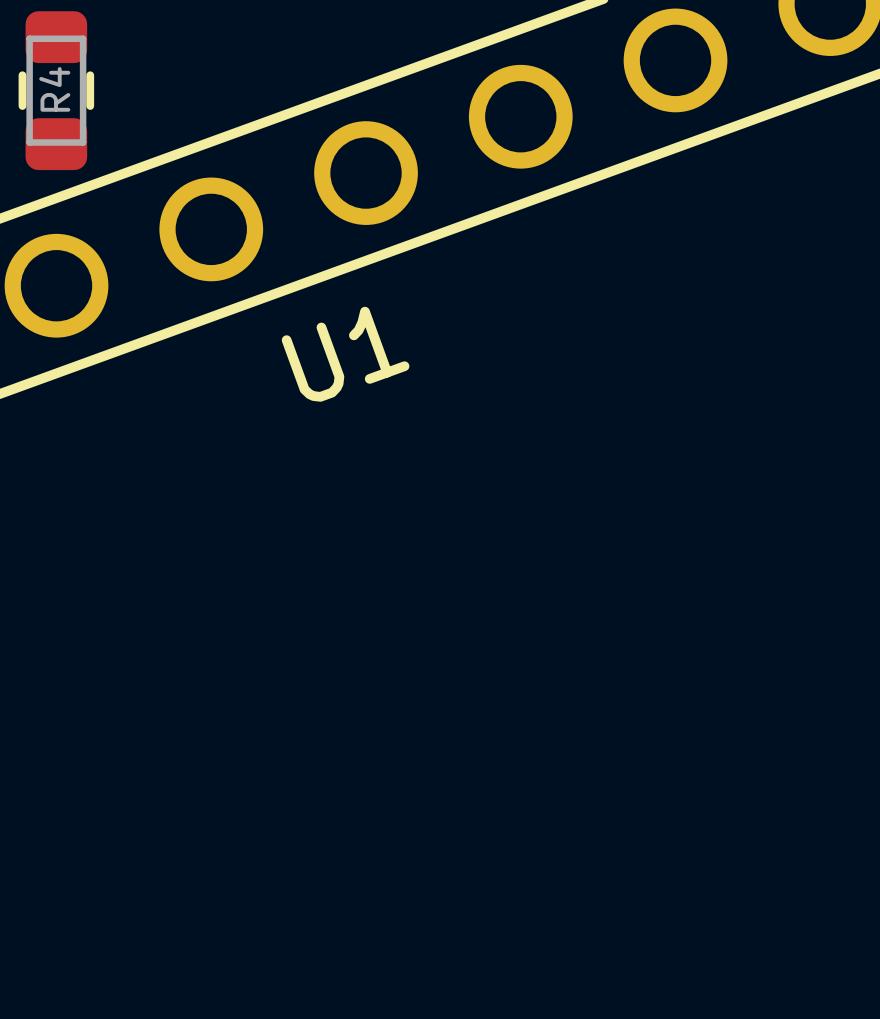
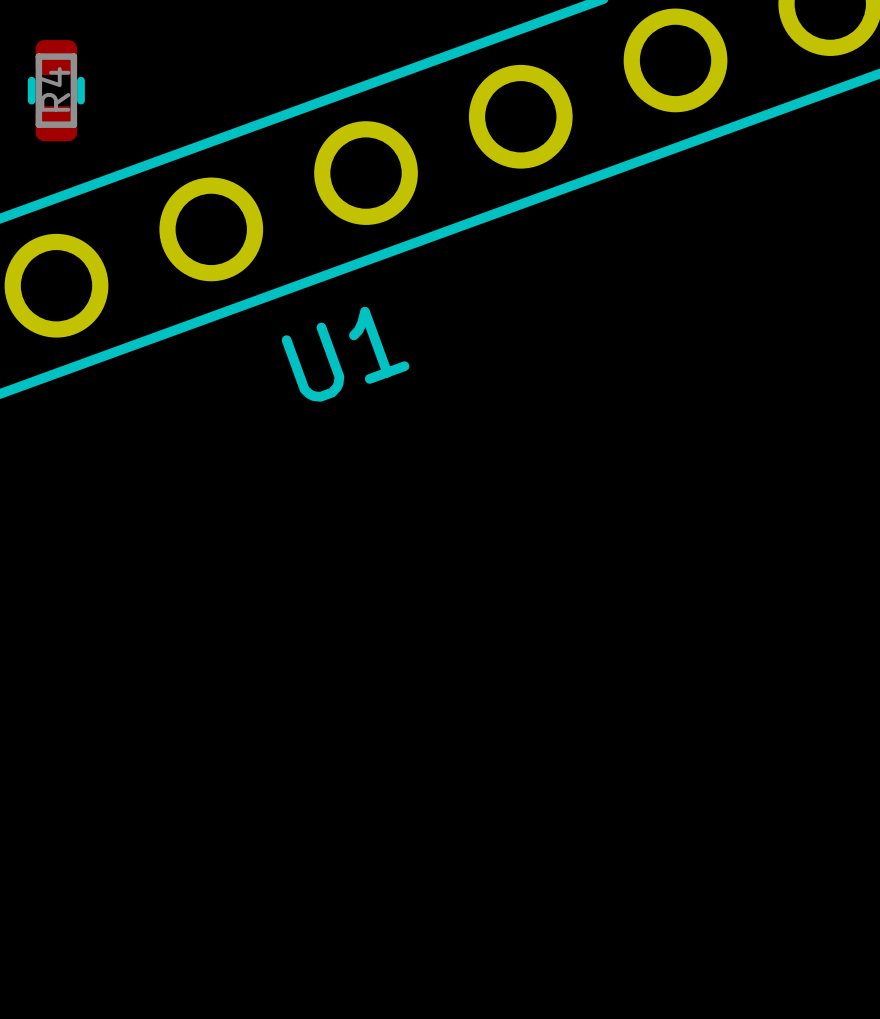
R4 footprint: [18, 11, 95, 171] -> [27, 40, 85, 142]

